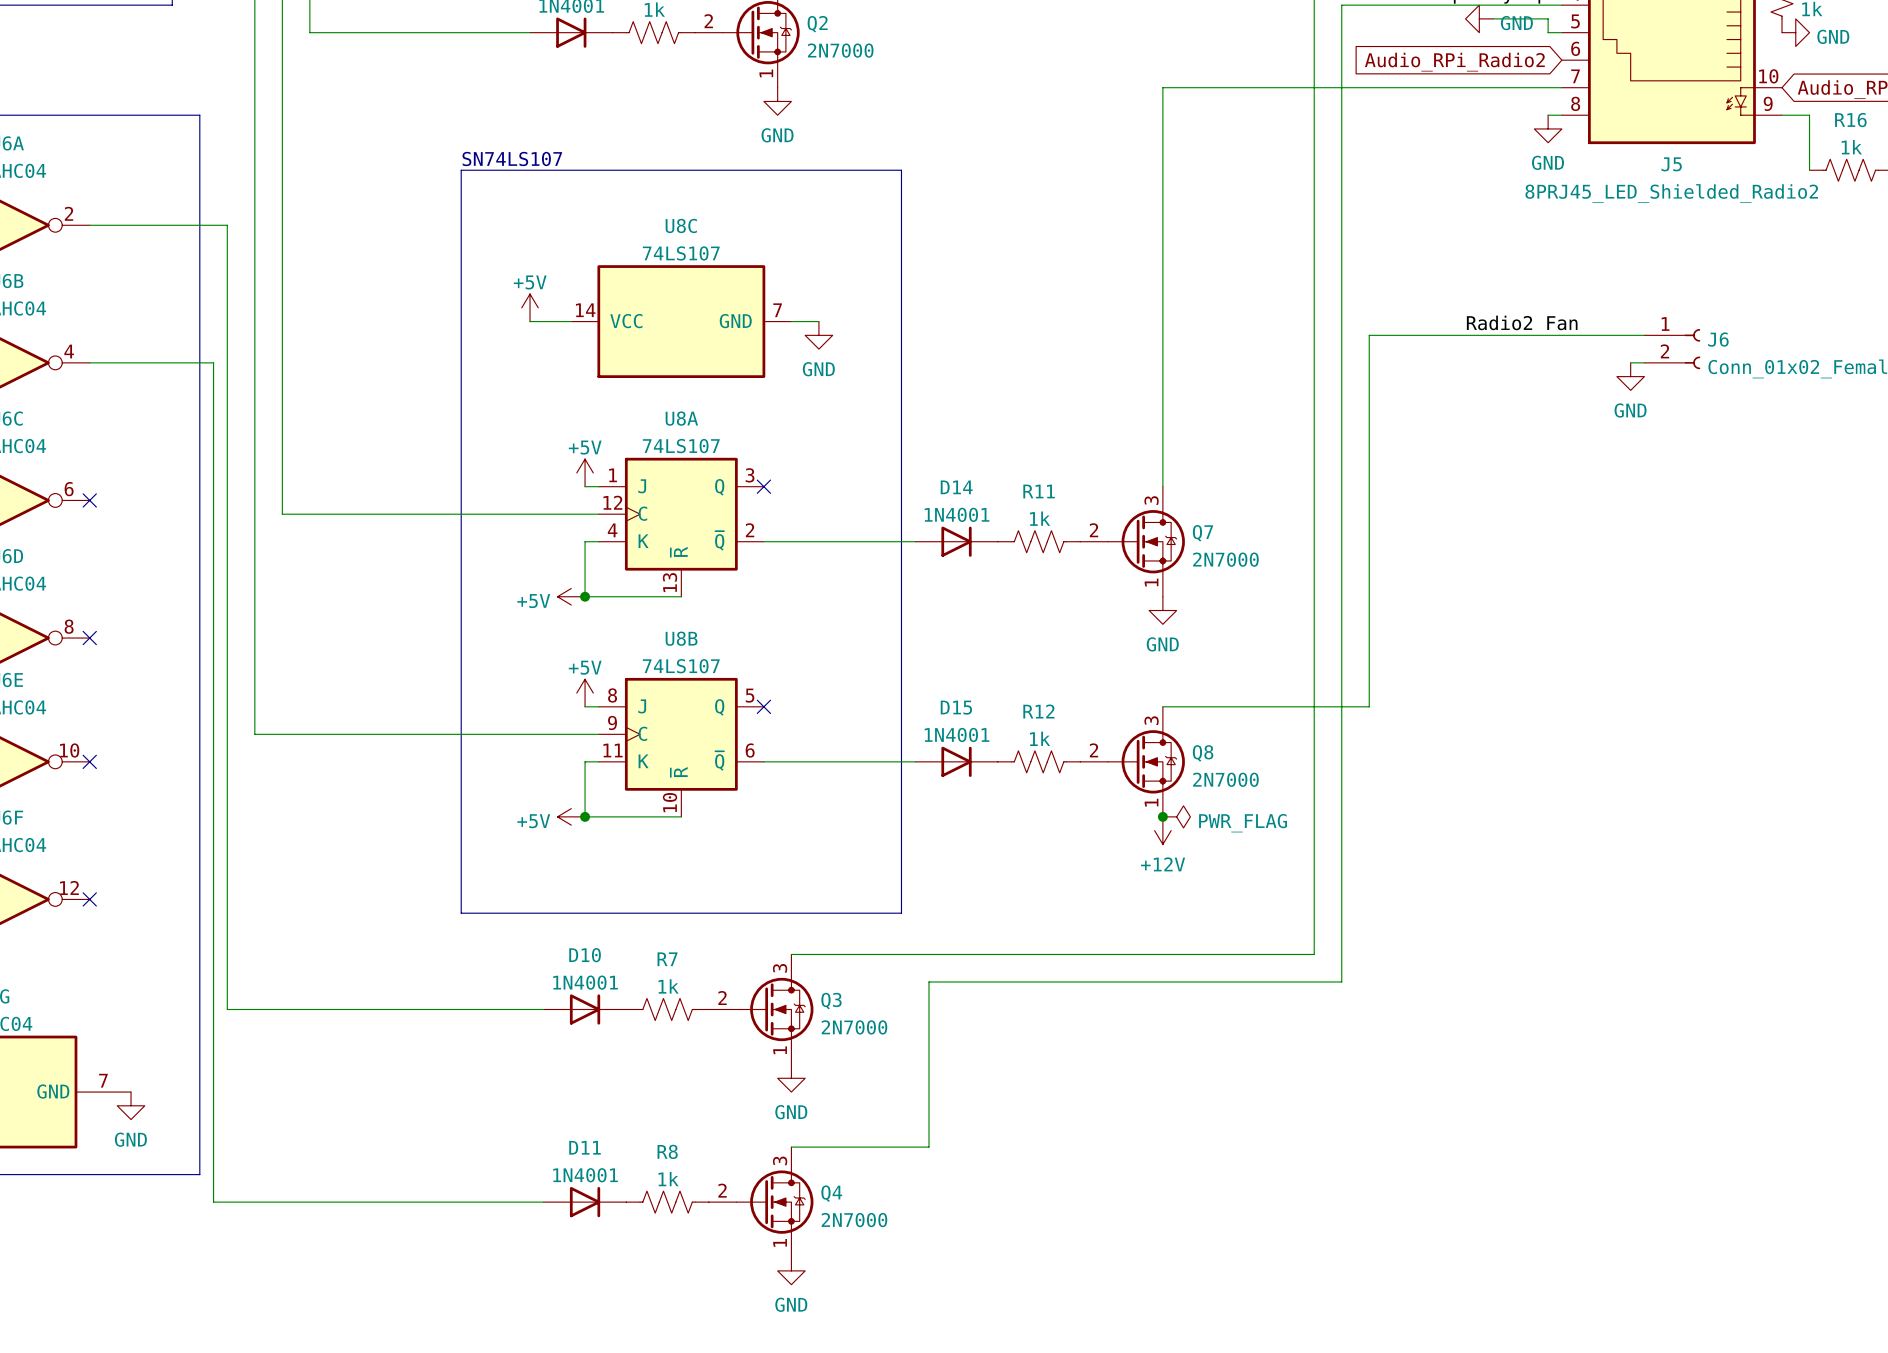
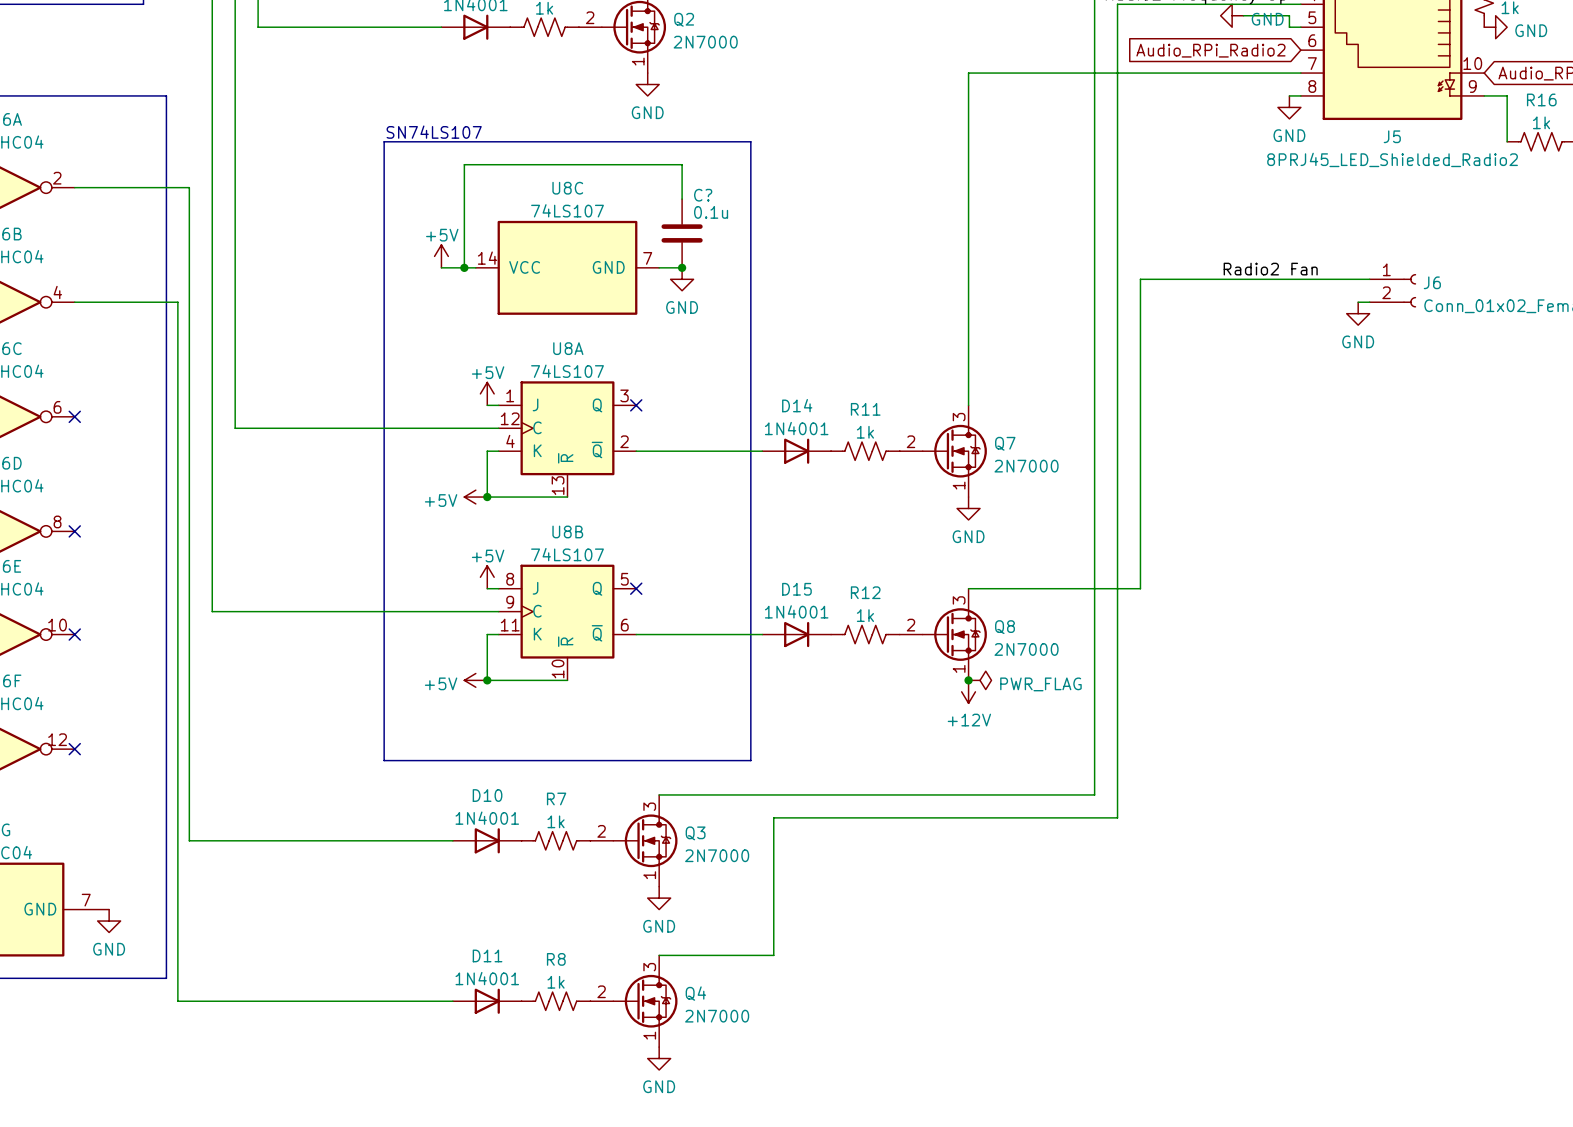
wire: none -> (682, 199) (682, 164) (464, 164) (464, 267)
C?: none -> 0.1u (682, 233)
junction: none -> (464, 267)
junction: none -> (682, 267)

